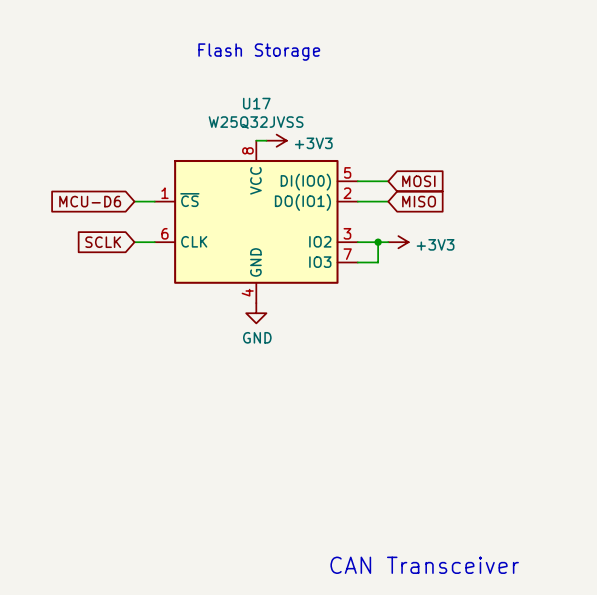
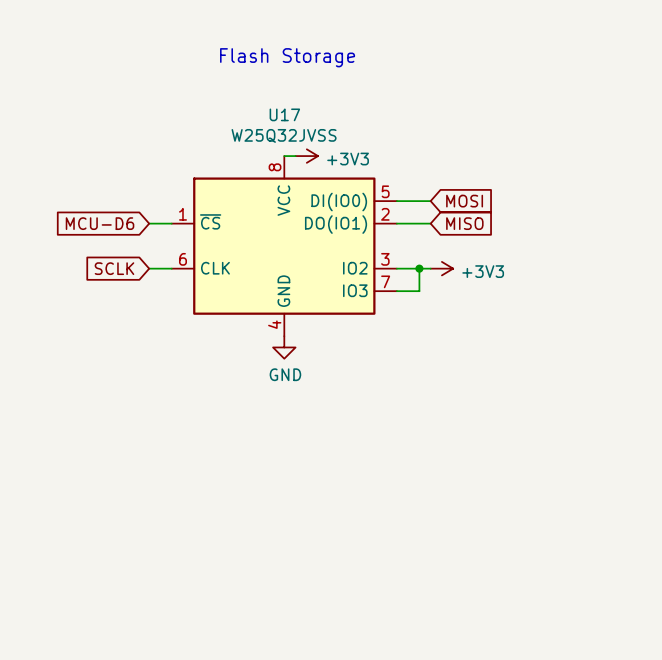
text: CAN Transceiver (424, 565) -> none

